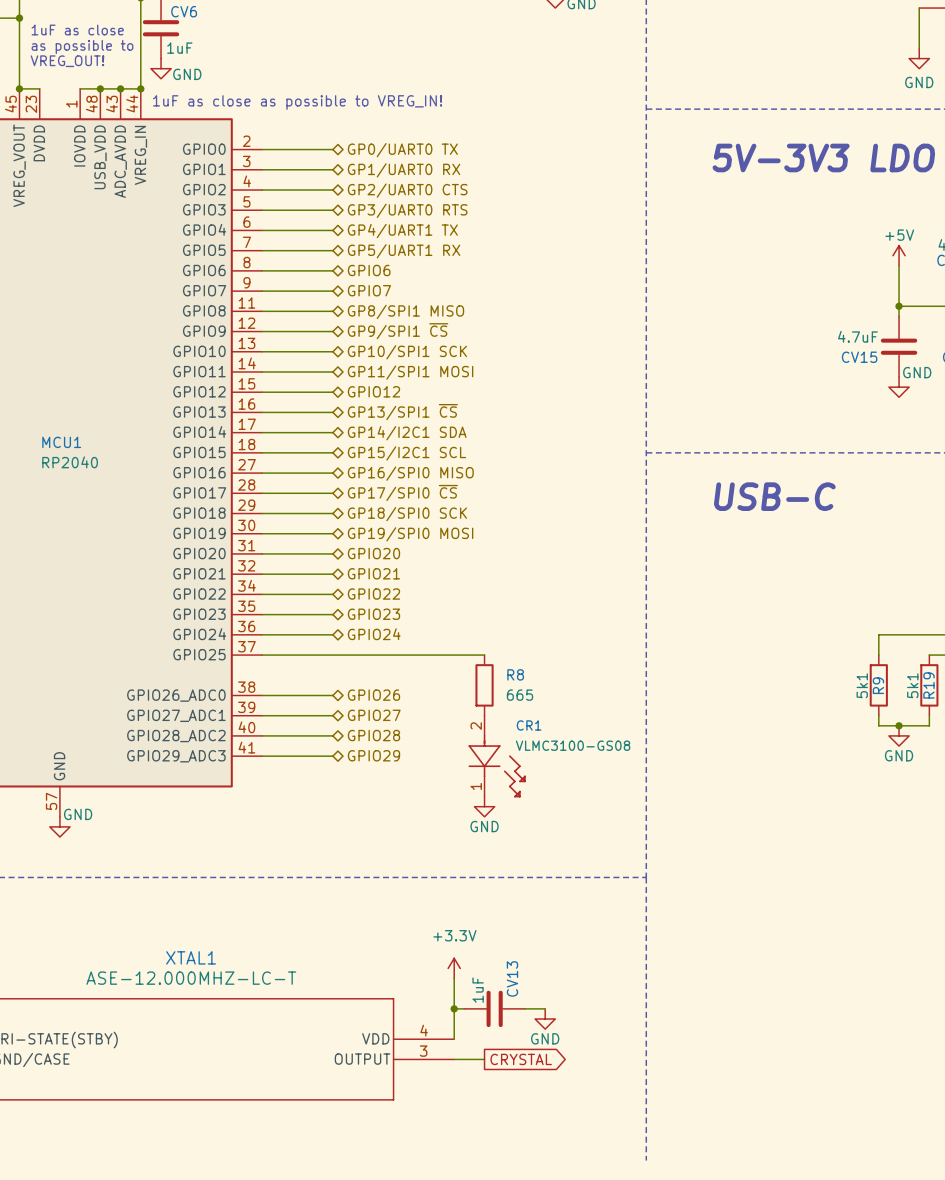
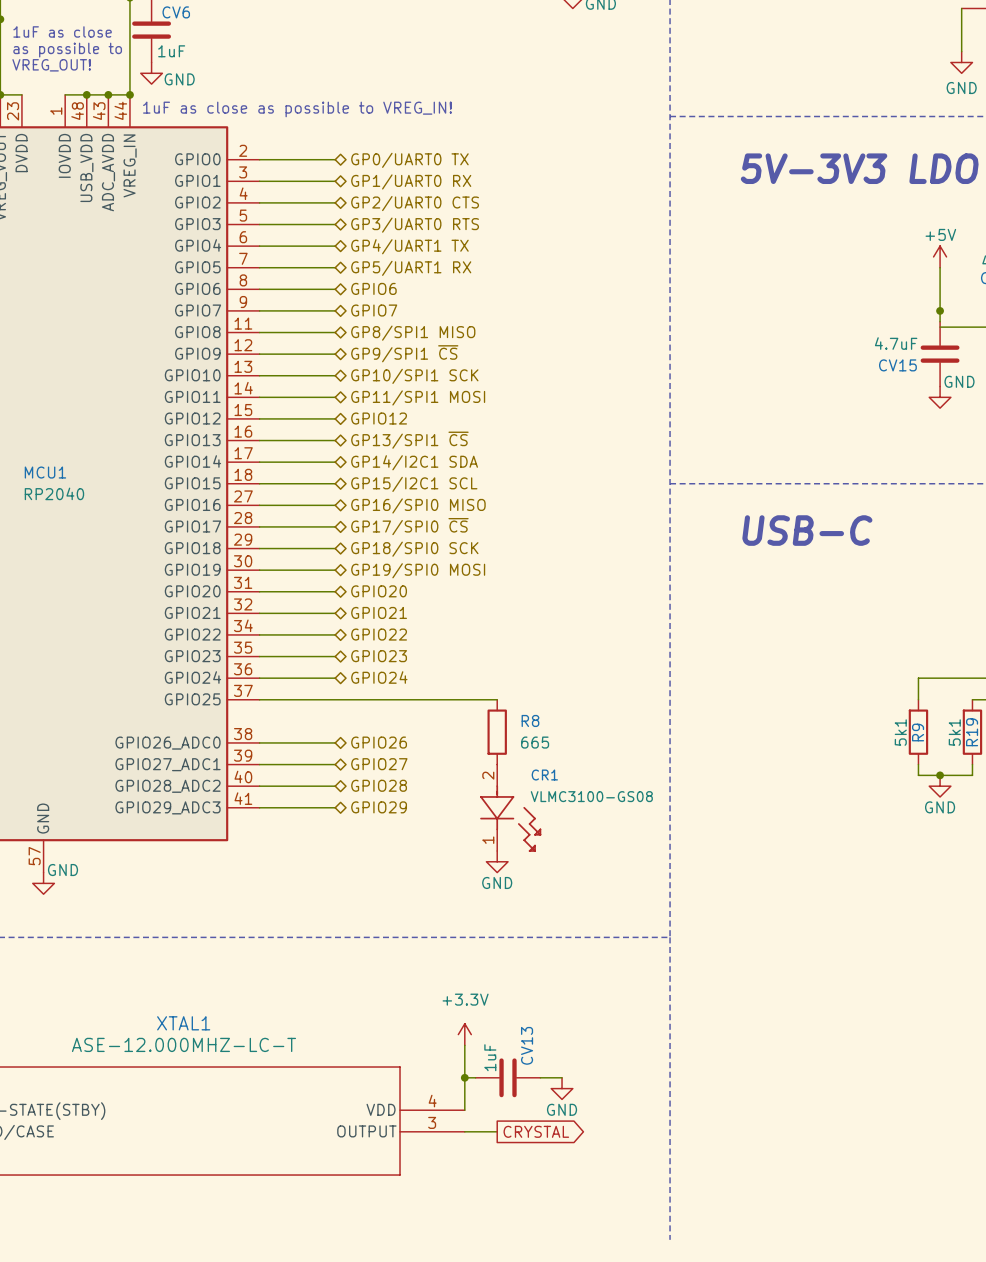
power symbol position: +5V (899, 255) -> +5V (940, 256)
junction position: (899, 306) -> (940, 310)
CV15 position: (899, 346) -> (940, 354)
power symbol position: GND (899, 387) -> GND (940, 397)

